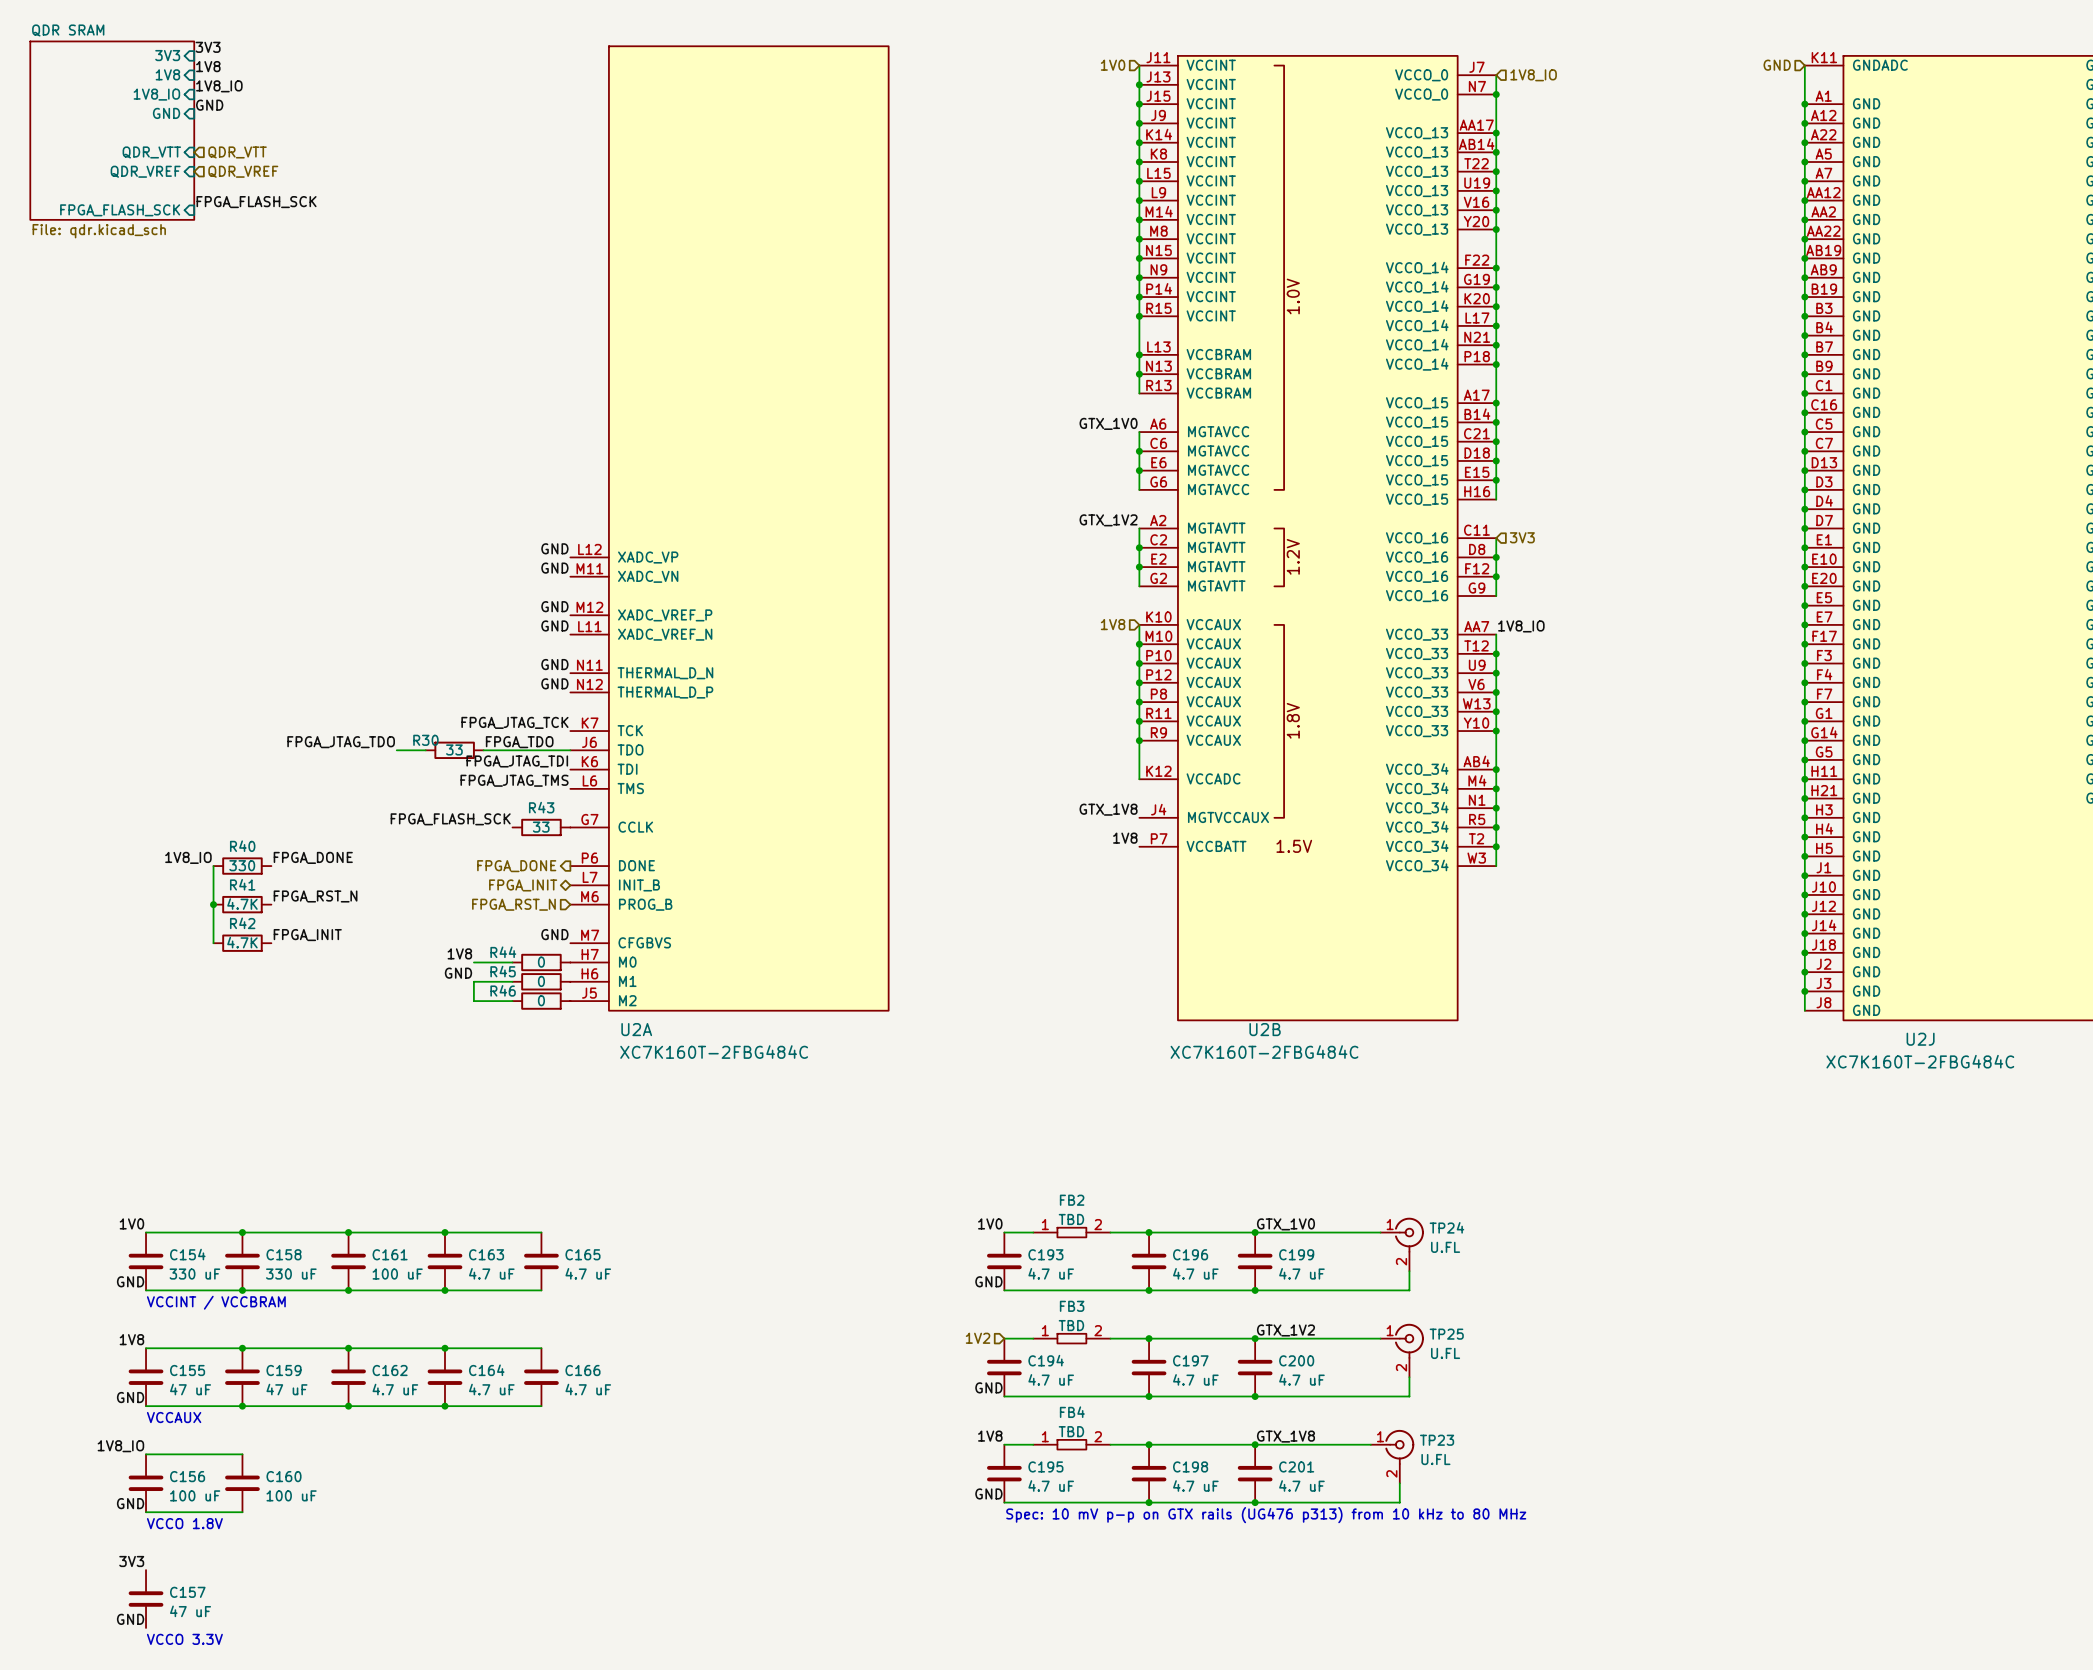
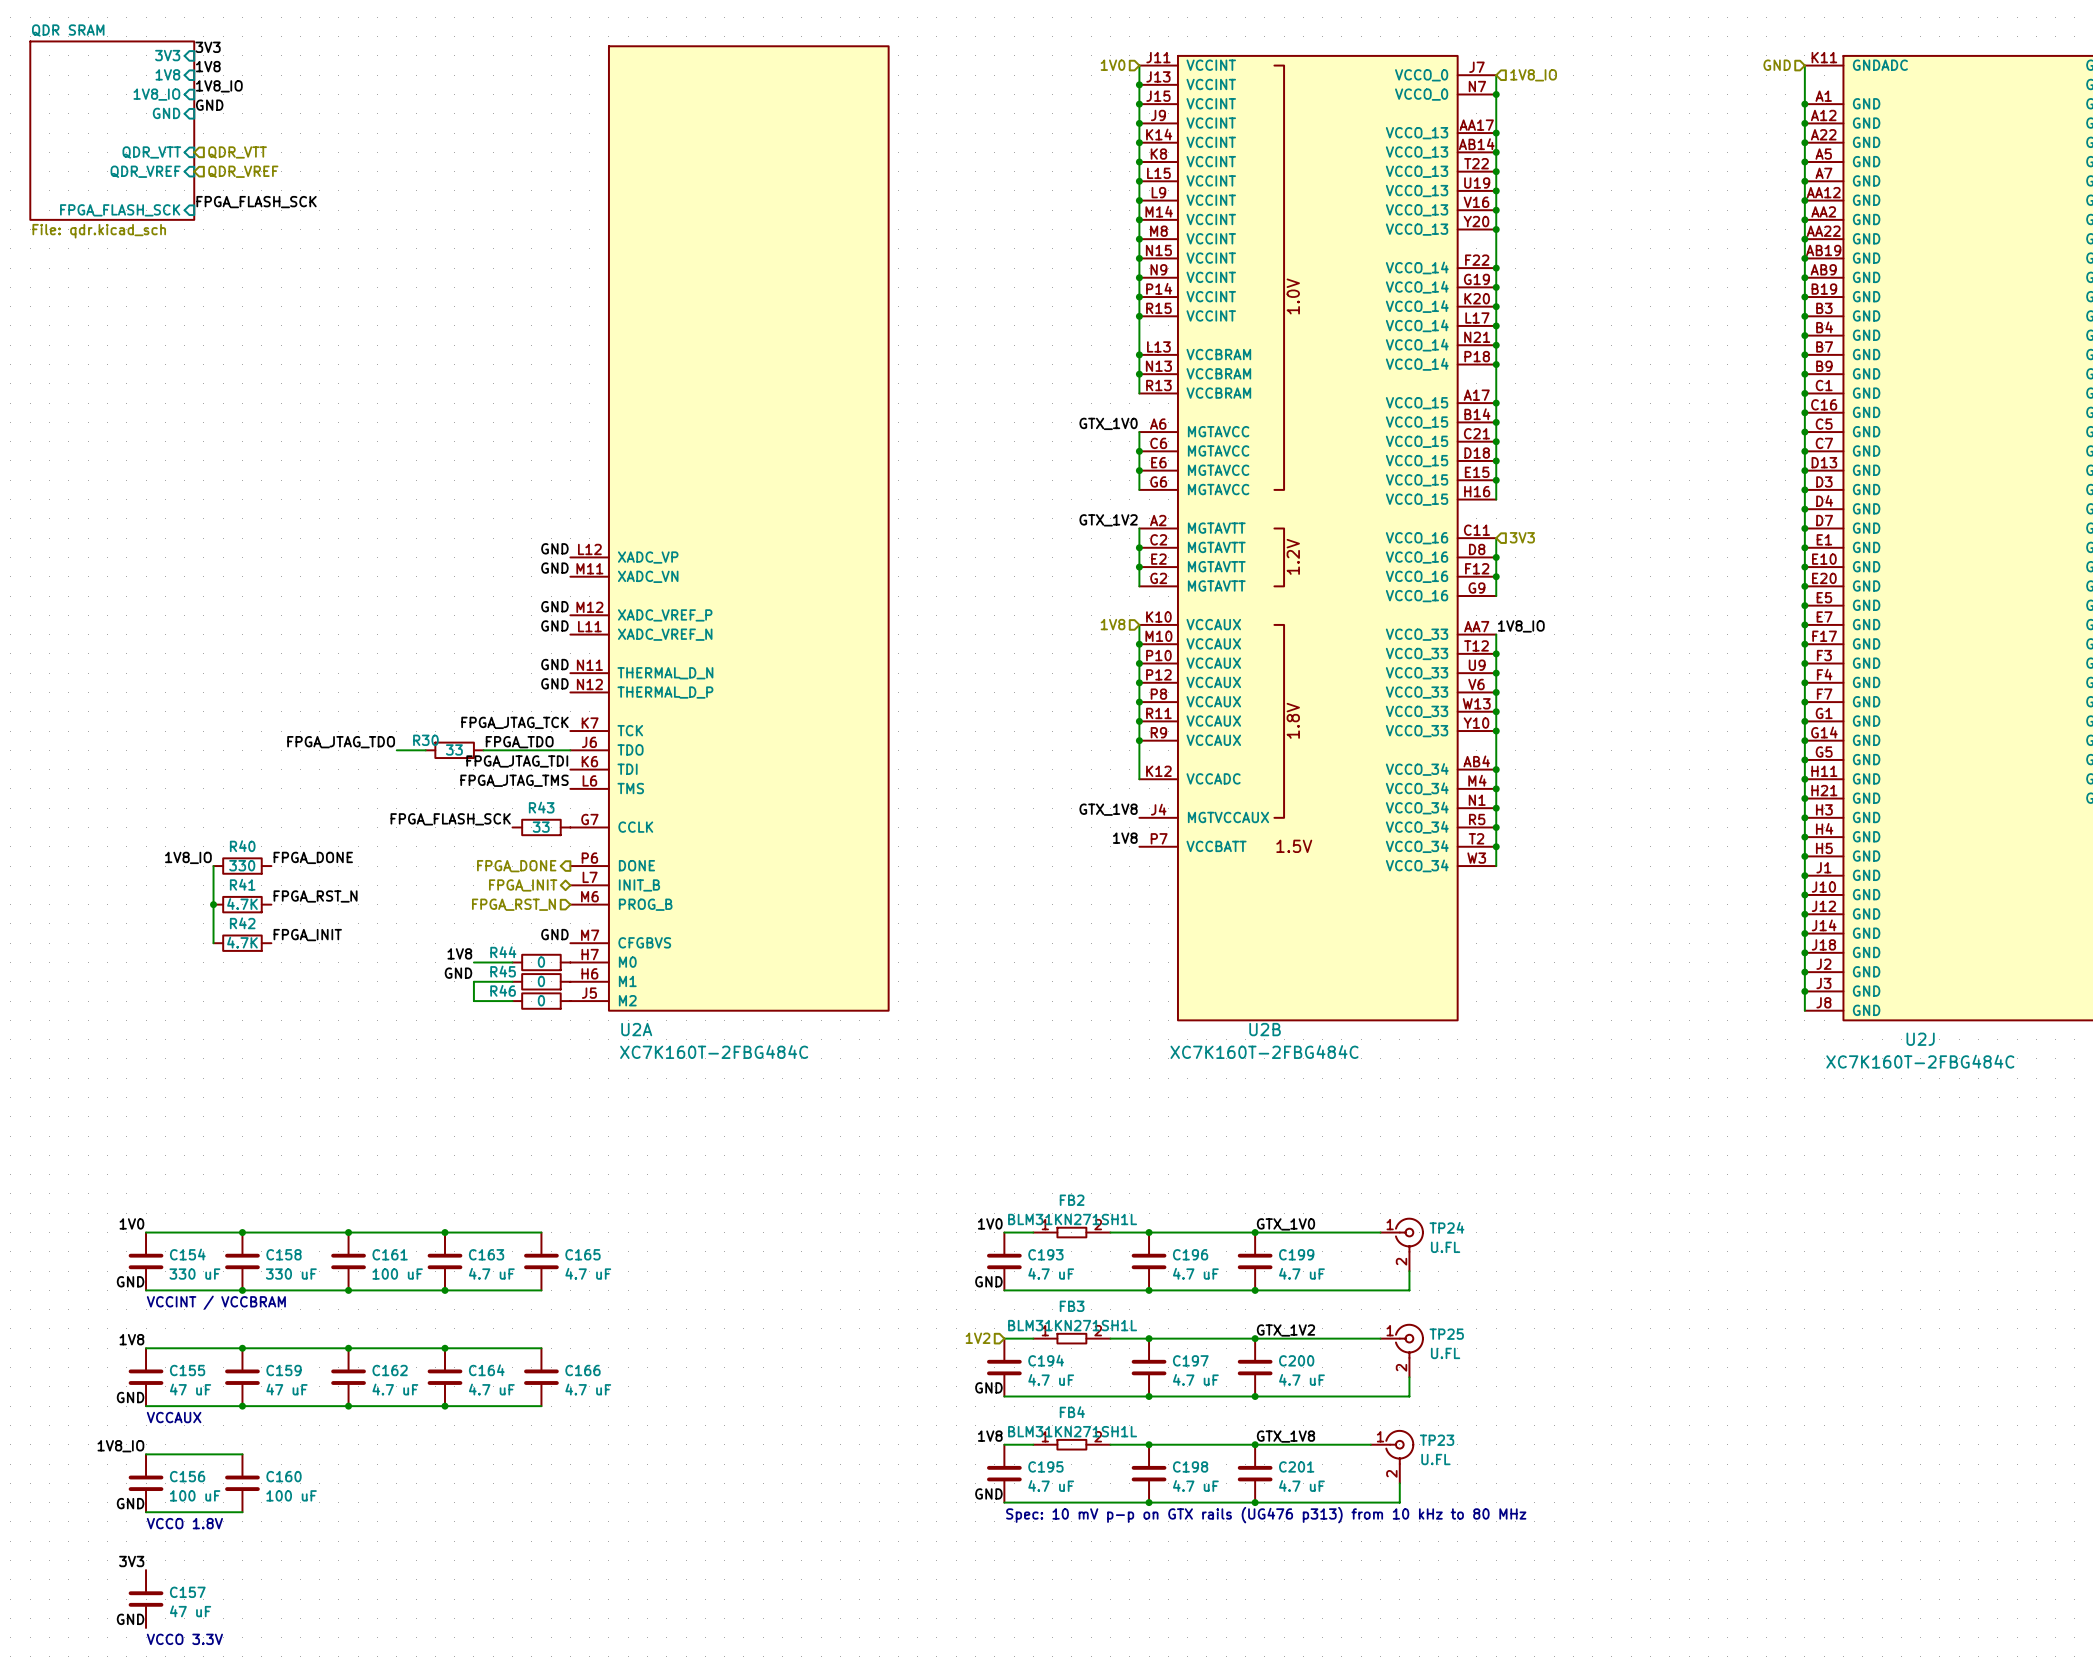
FB2 value: TBD (1071, 1219) -> BLM31KN271SH1L (1072, 1219)
FB3 value: TBD (1071, 1325) -> BLM31KN271SH1L (1072, 1325)
FB4 value: TBD (1071, 1431) -> BLM31KN271SH1L (1072, 1431)

